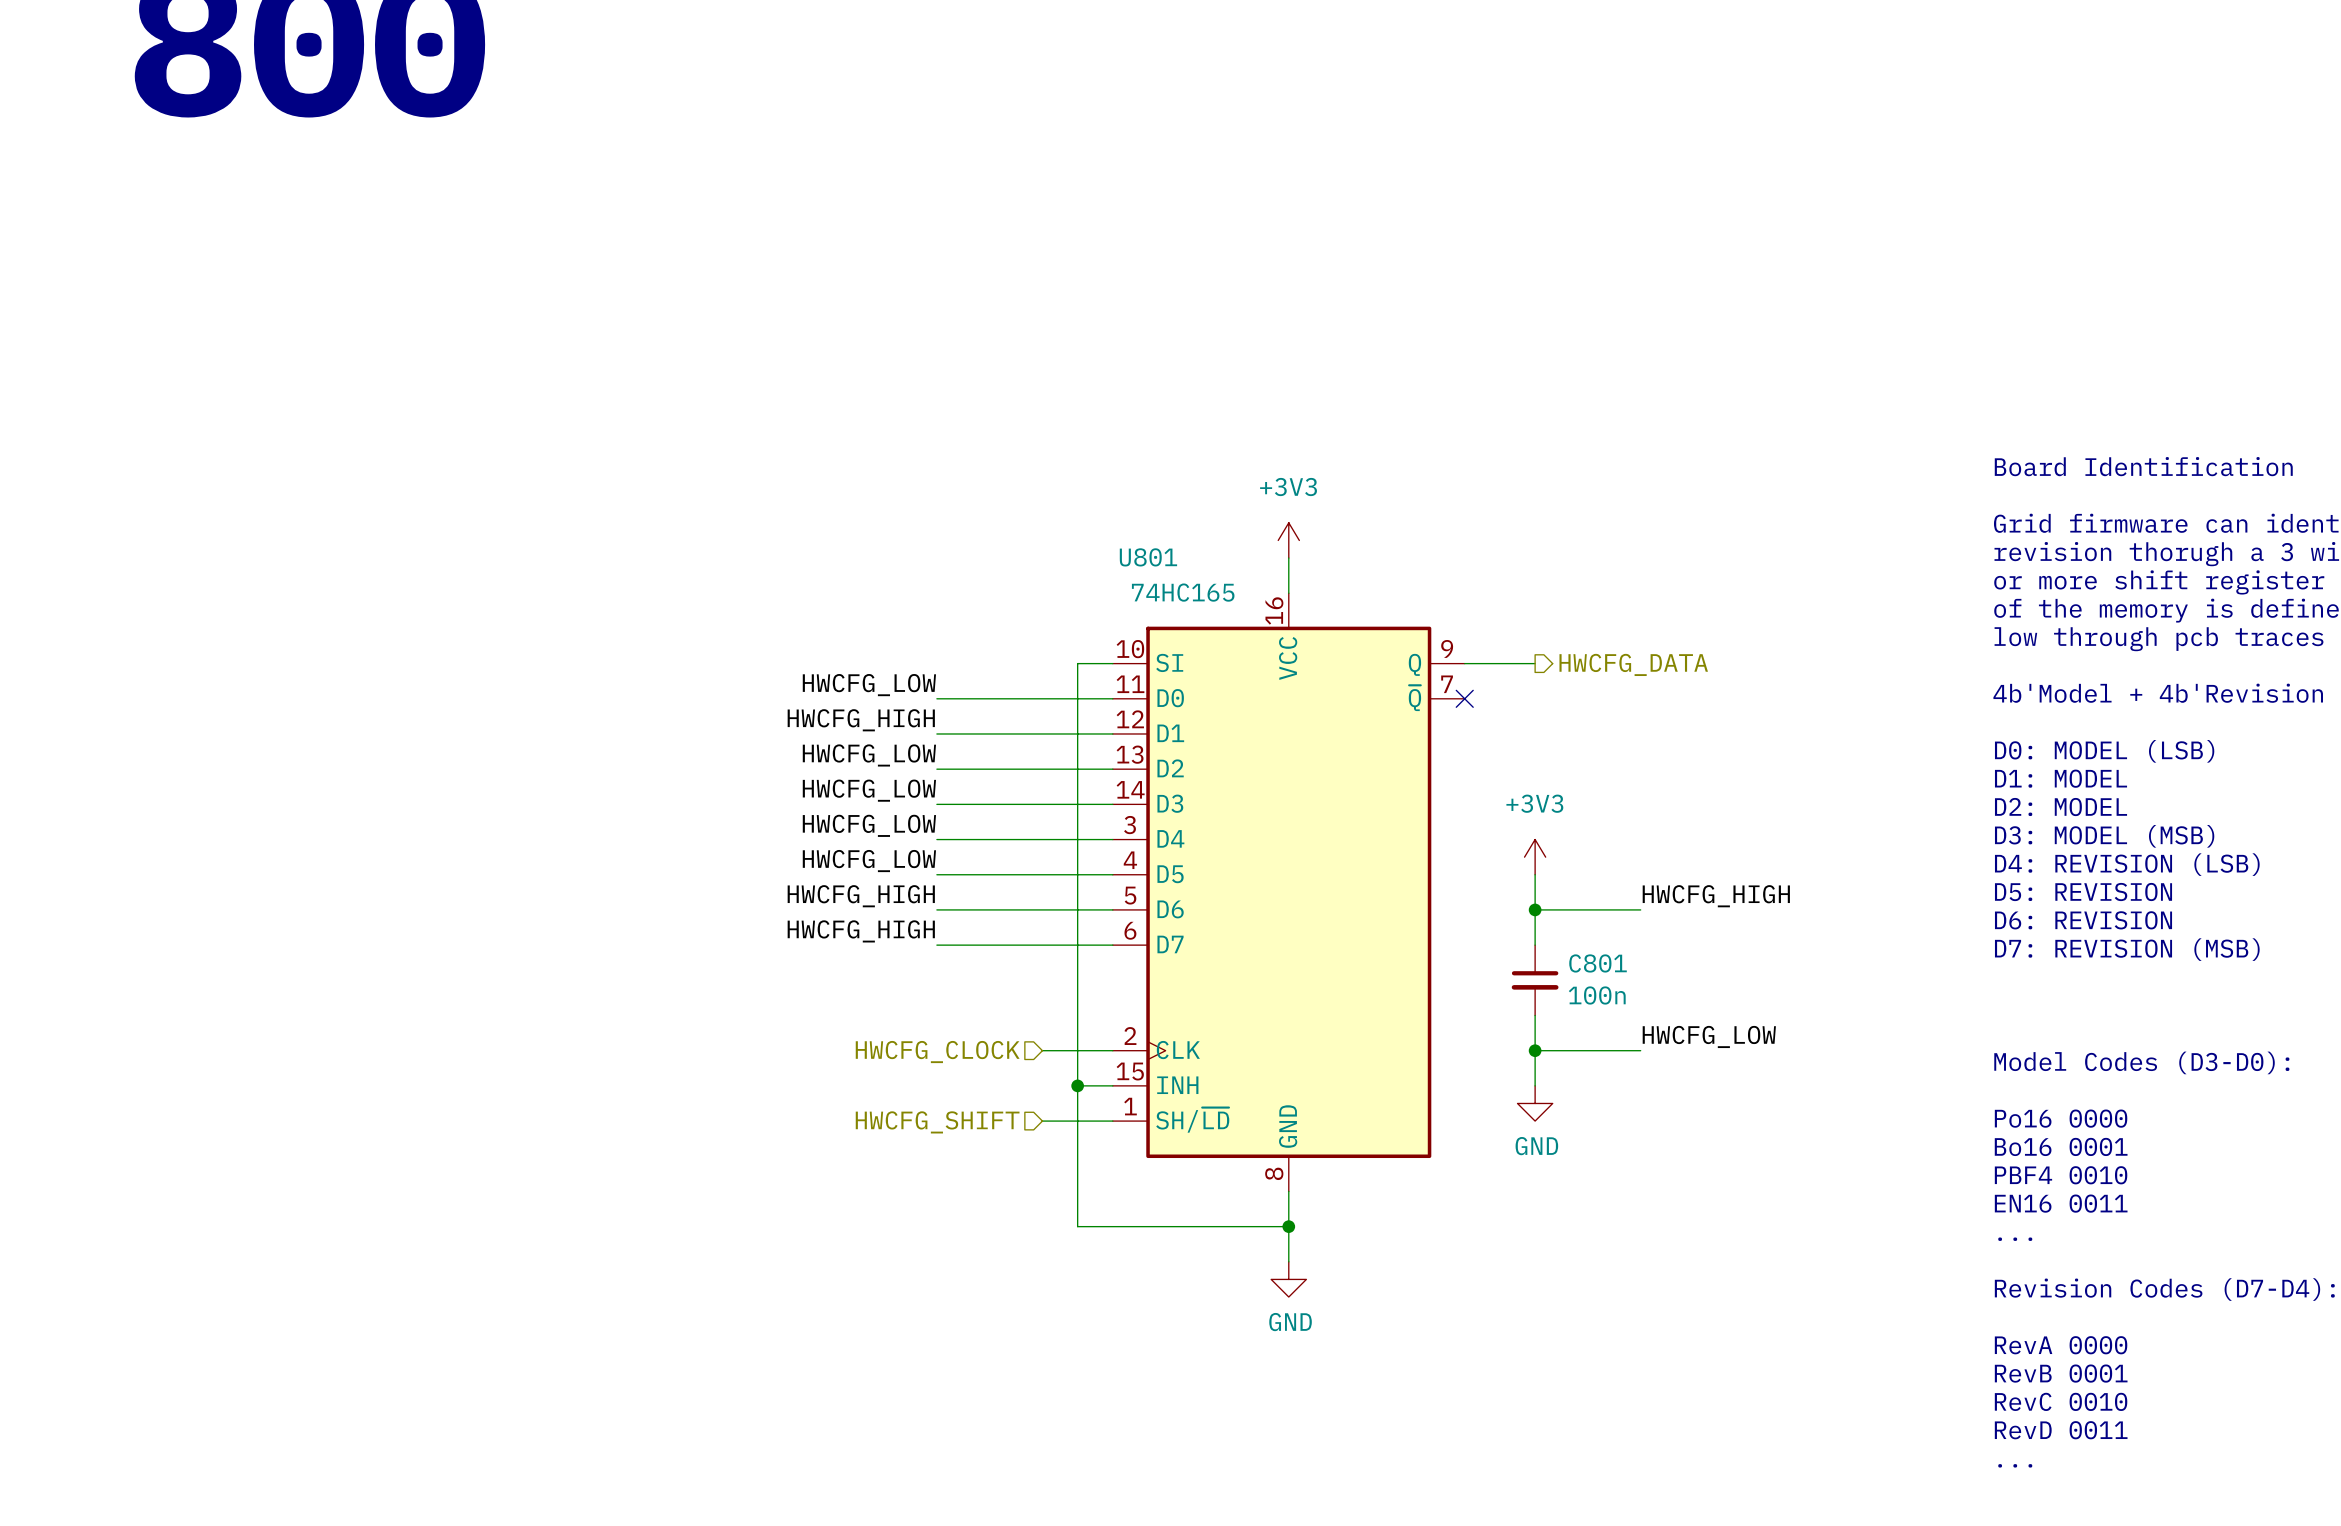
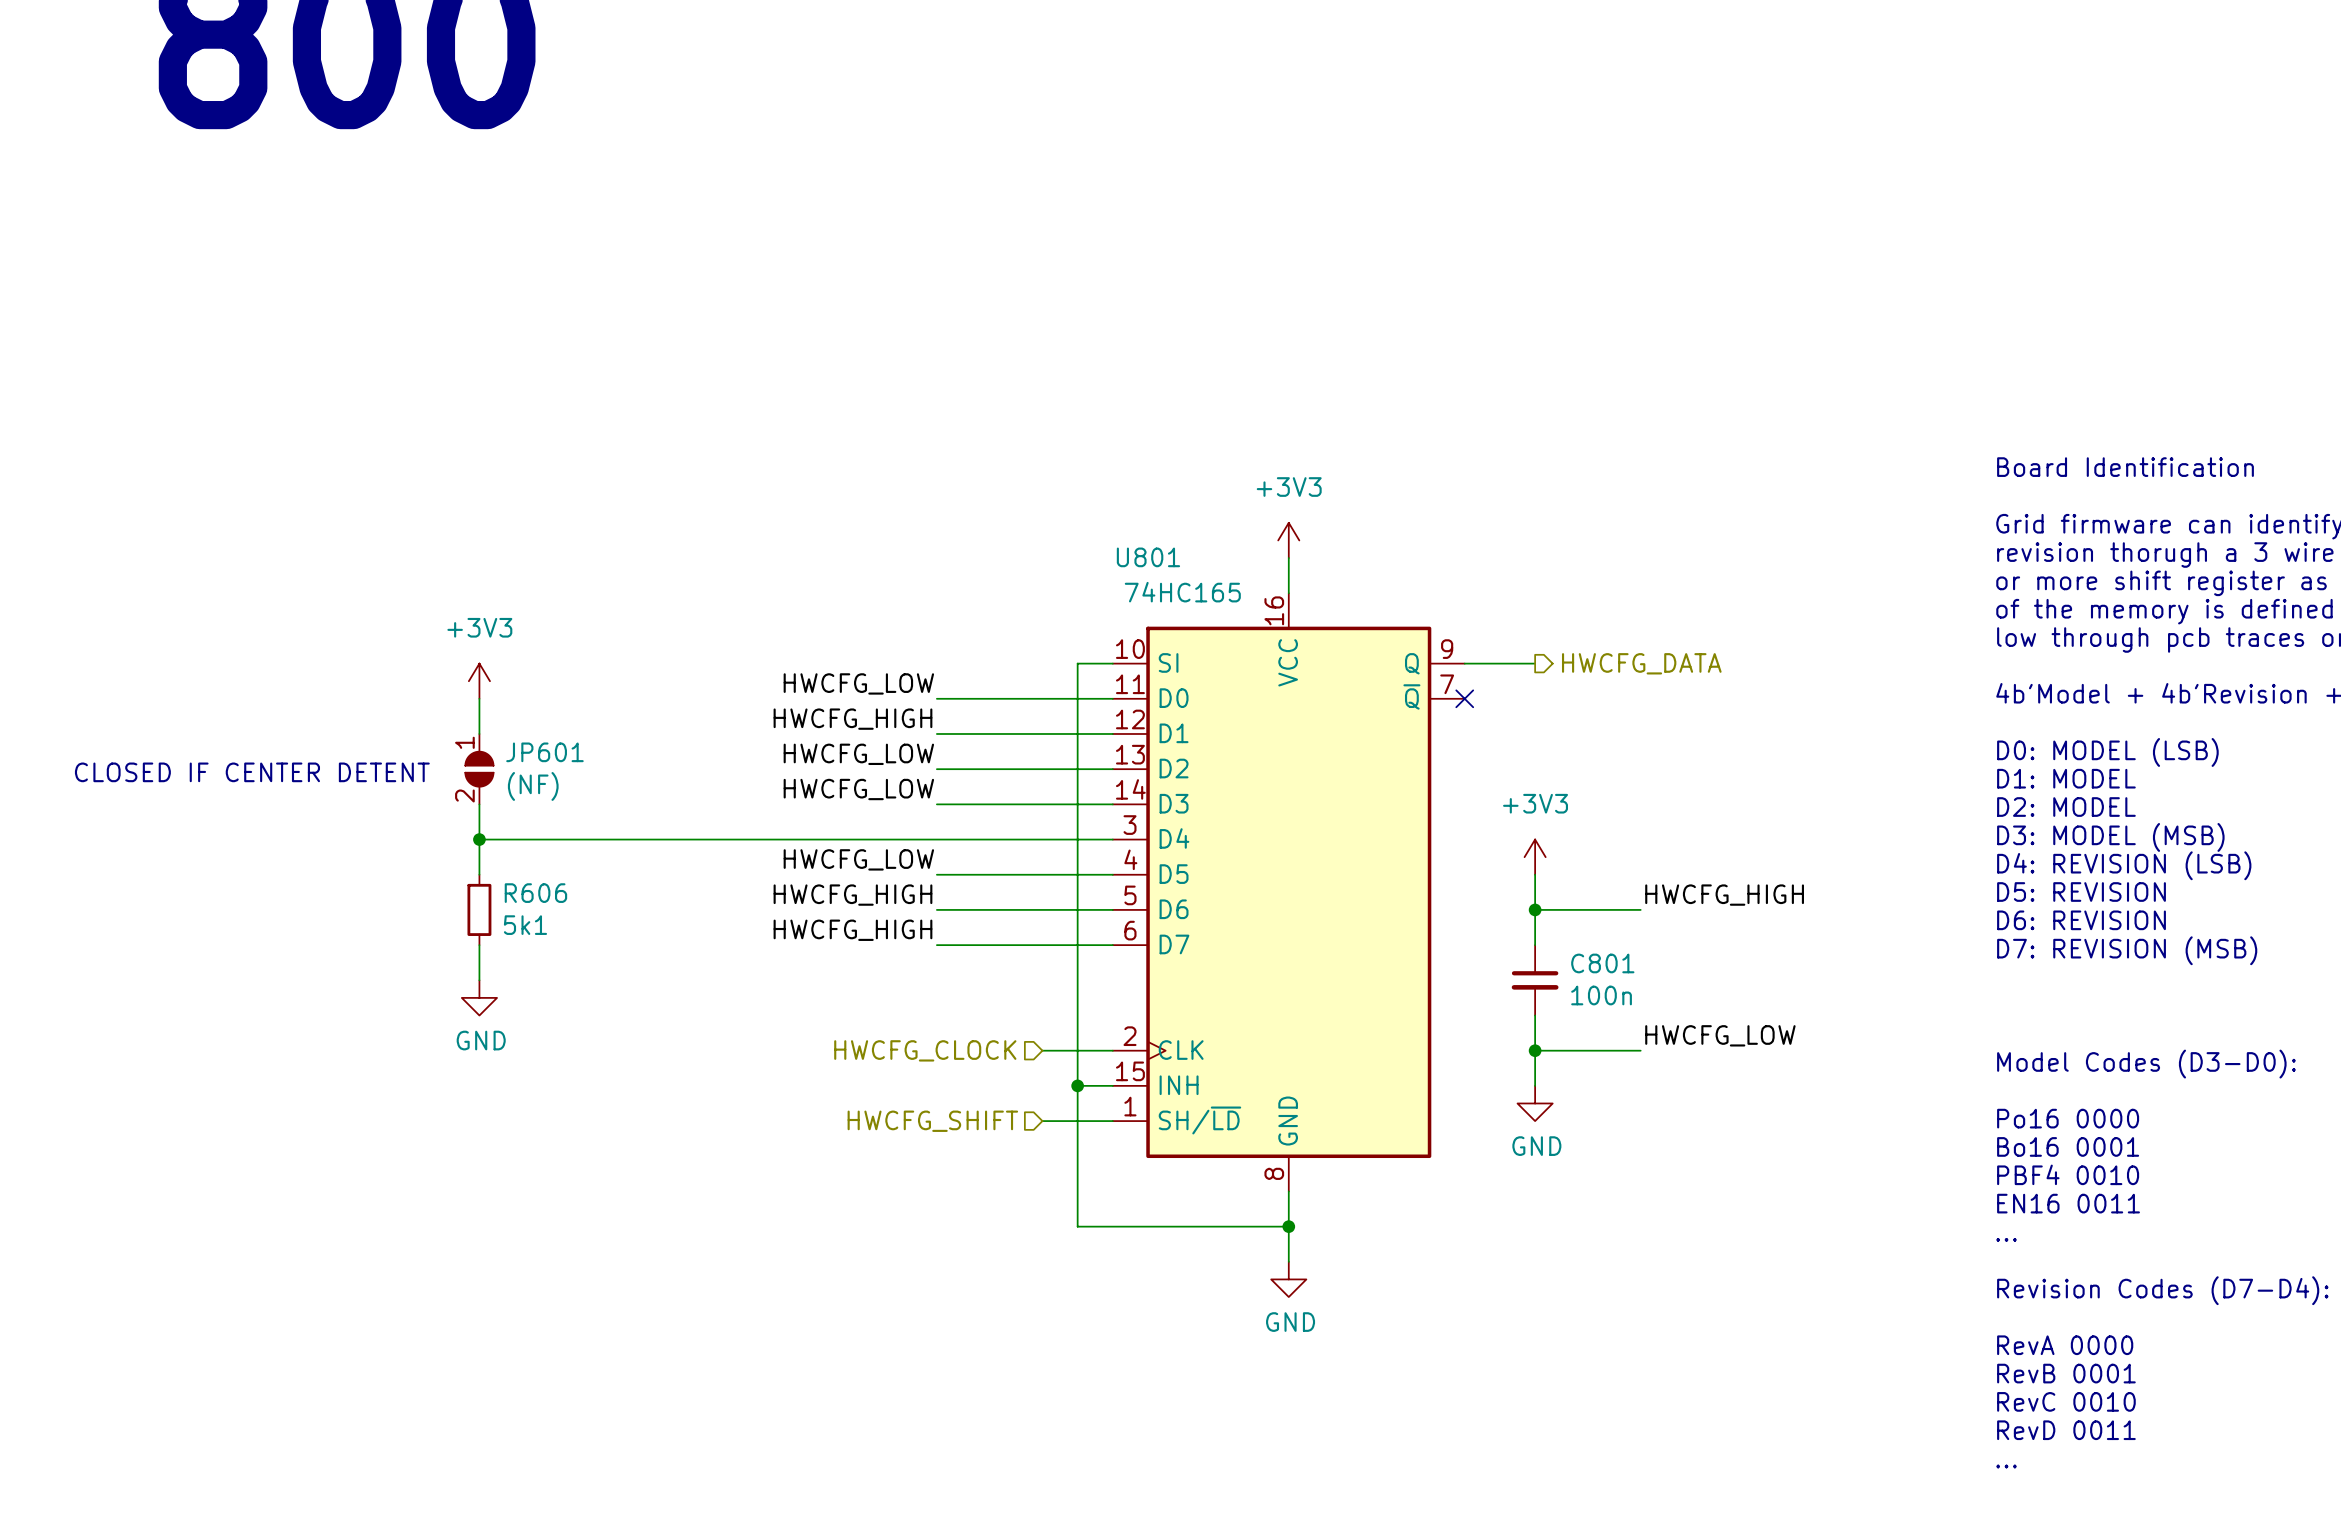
power symbol: none -> +3V3 (479, 681)
wire: none -> (479, 698) (479, 733)
JP601: none -> (NF) (479, 769)
text: none -> CLOSED IF CENTER DETENT (252, 772)
wire: none -> (479, 804) (479, 874)
label: HWCFG_LOW (869, 825) -> none
wire: none -> (479, 839) (936, 839)
junction: none -> (479, 839)
R606: none -> 5k1 (479, 909)
wire: none -> (479, 945) (479, 980)
power symbol: none -> GND (479, 997)

